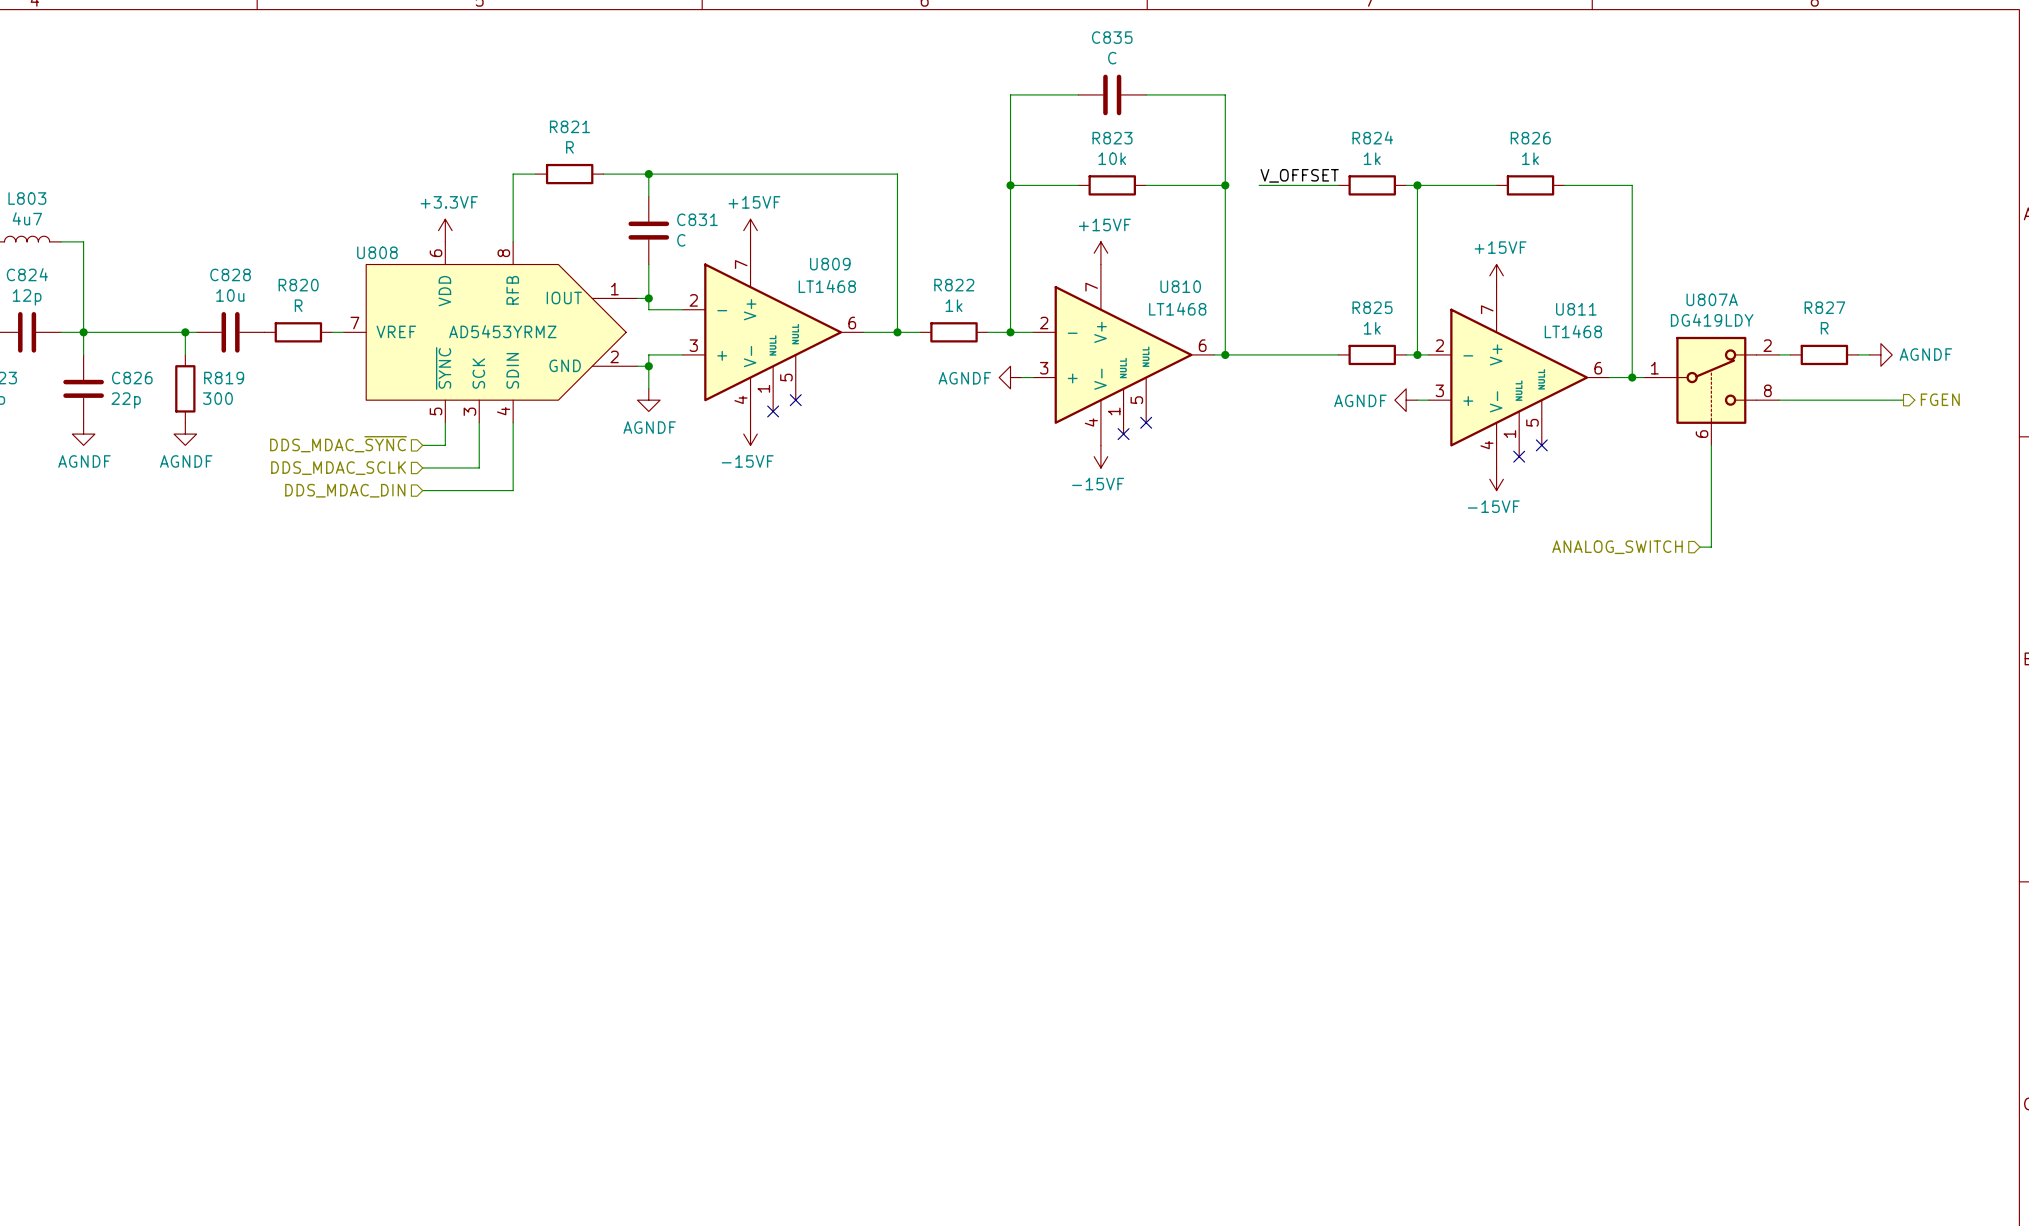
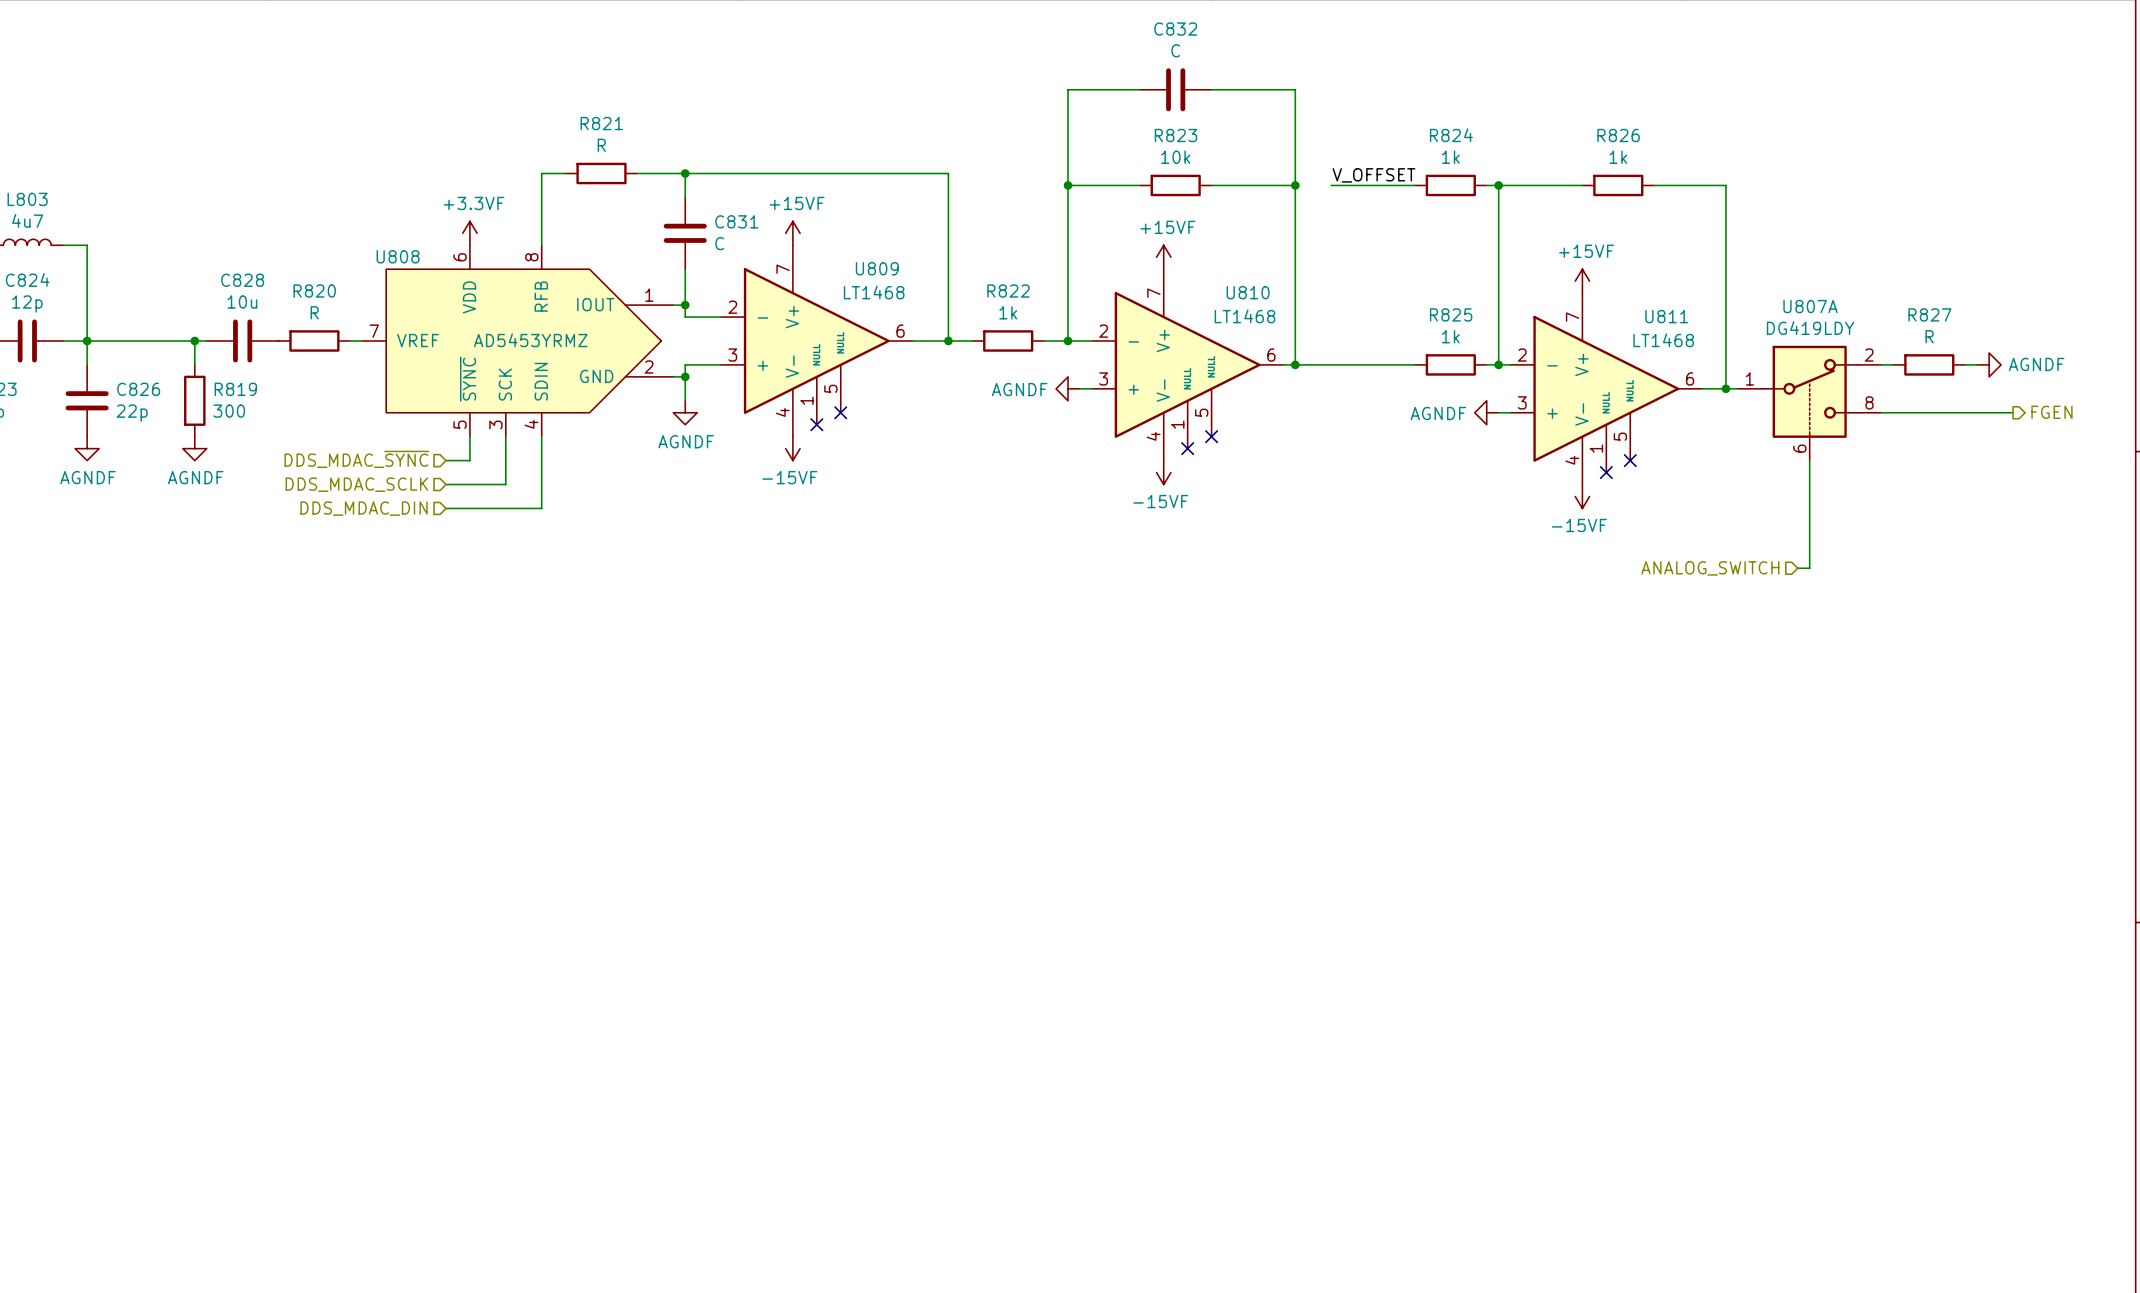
C835 name: C835 (1112, 37) -> C832 (1175, 29)

